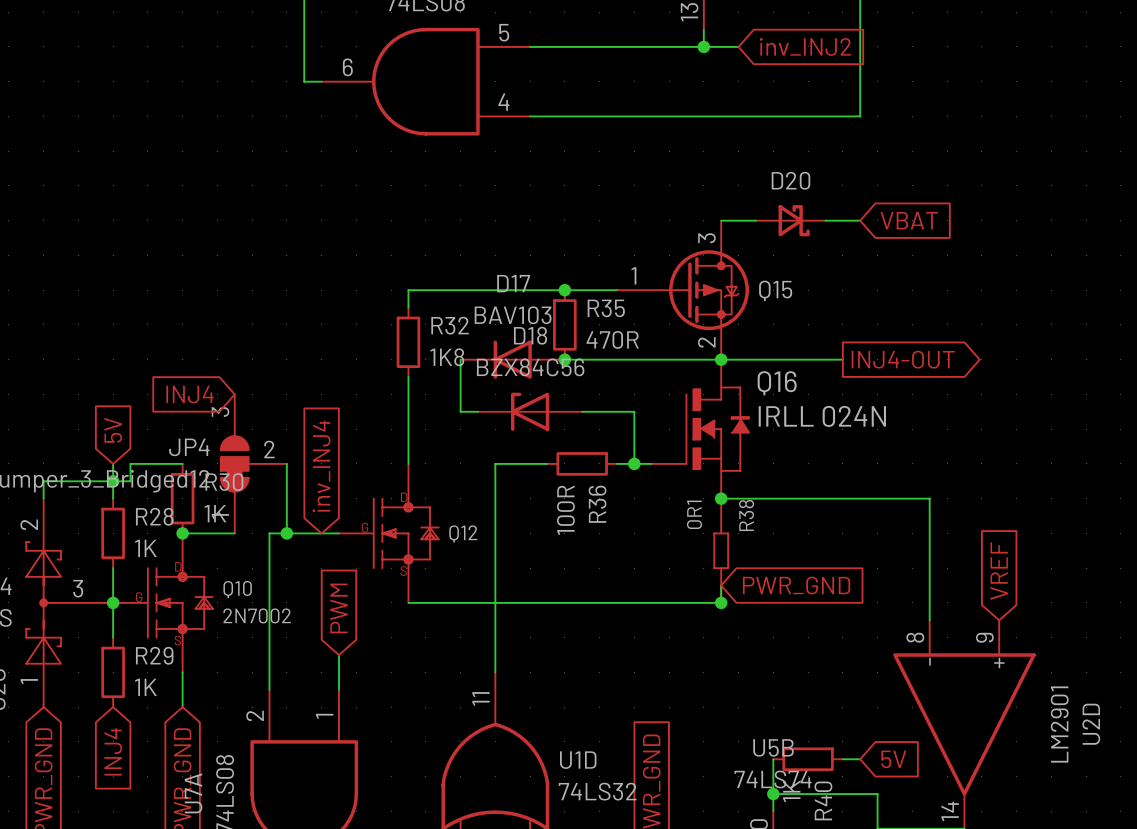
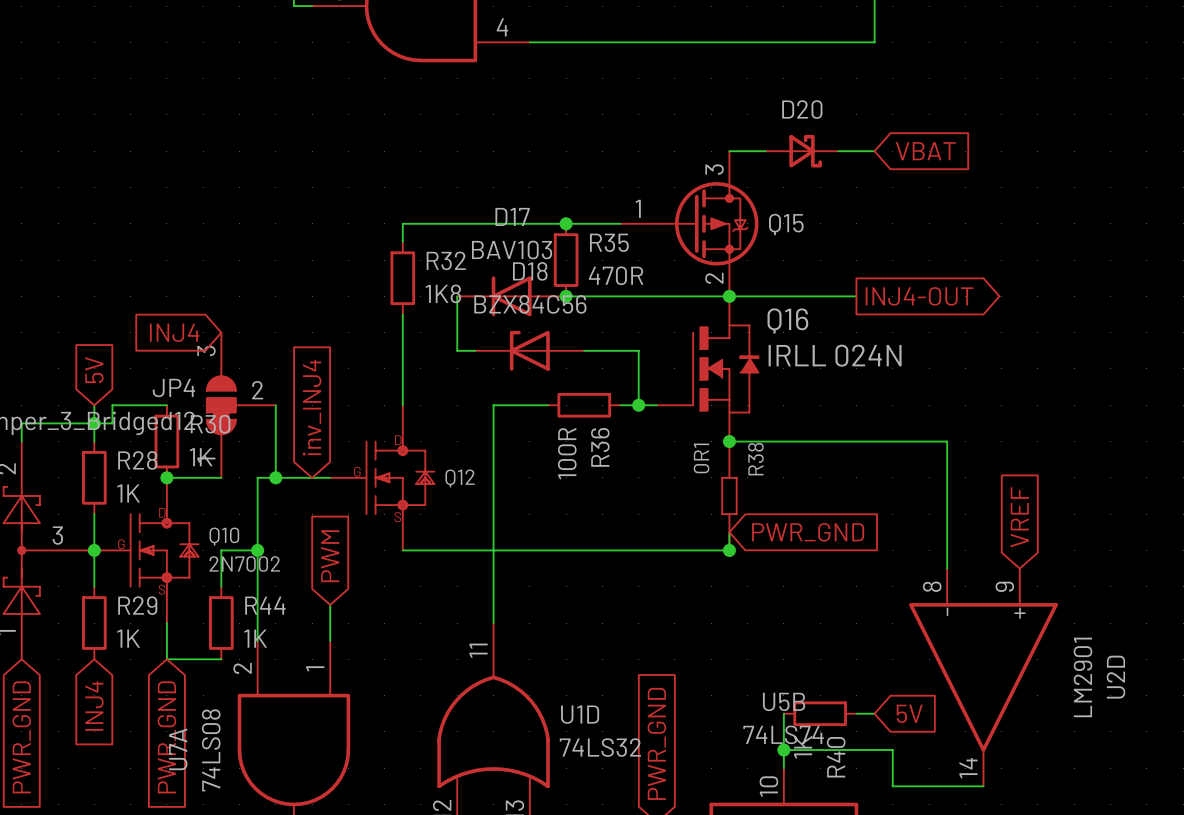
wire: none -> (257, 550) (221, 550) (221, 586)
junction: none -> (257, 550)
R44: none -> 1K (221, 623)
wire: none -> (166, 659) (221, 659)

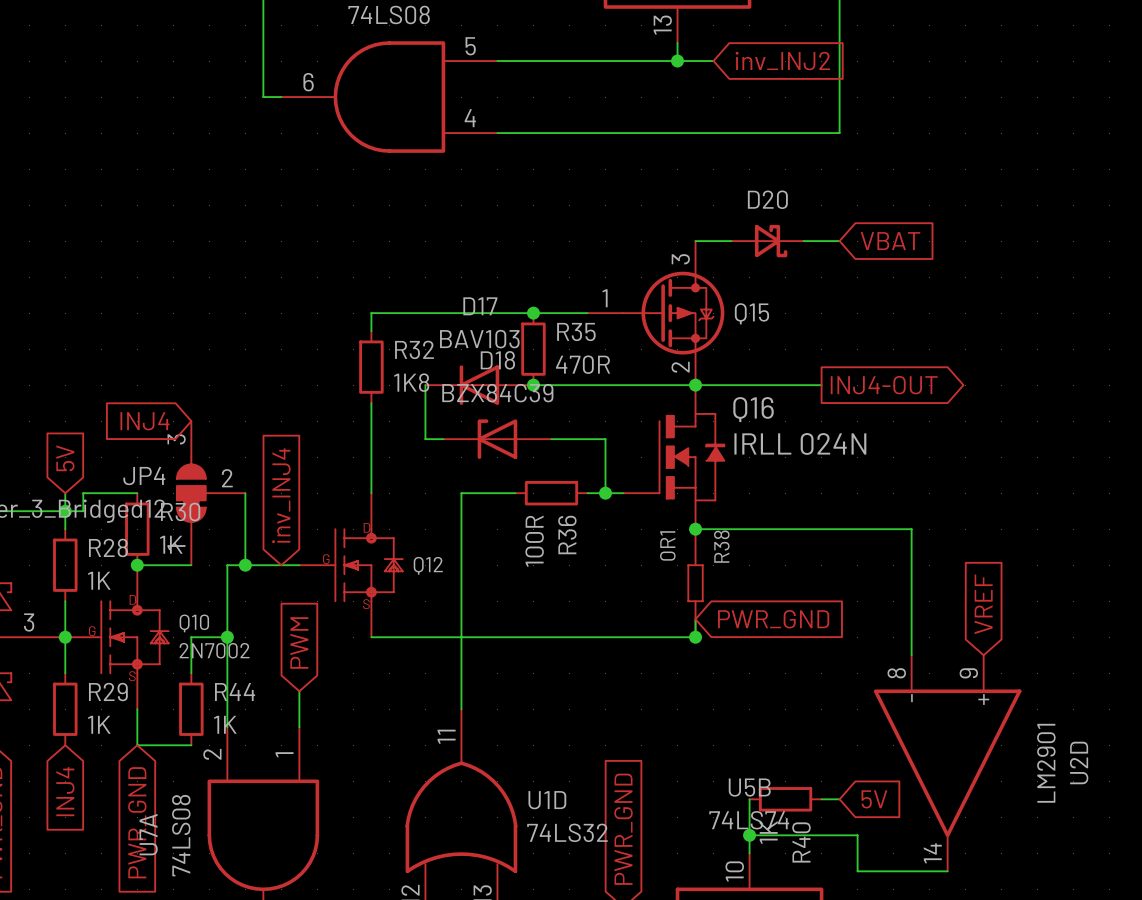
D18 value: BZX84C56 (530, 304) -> BZX84C39 (497, 393)

